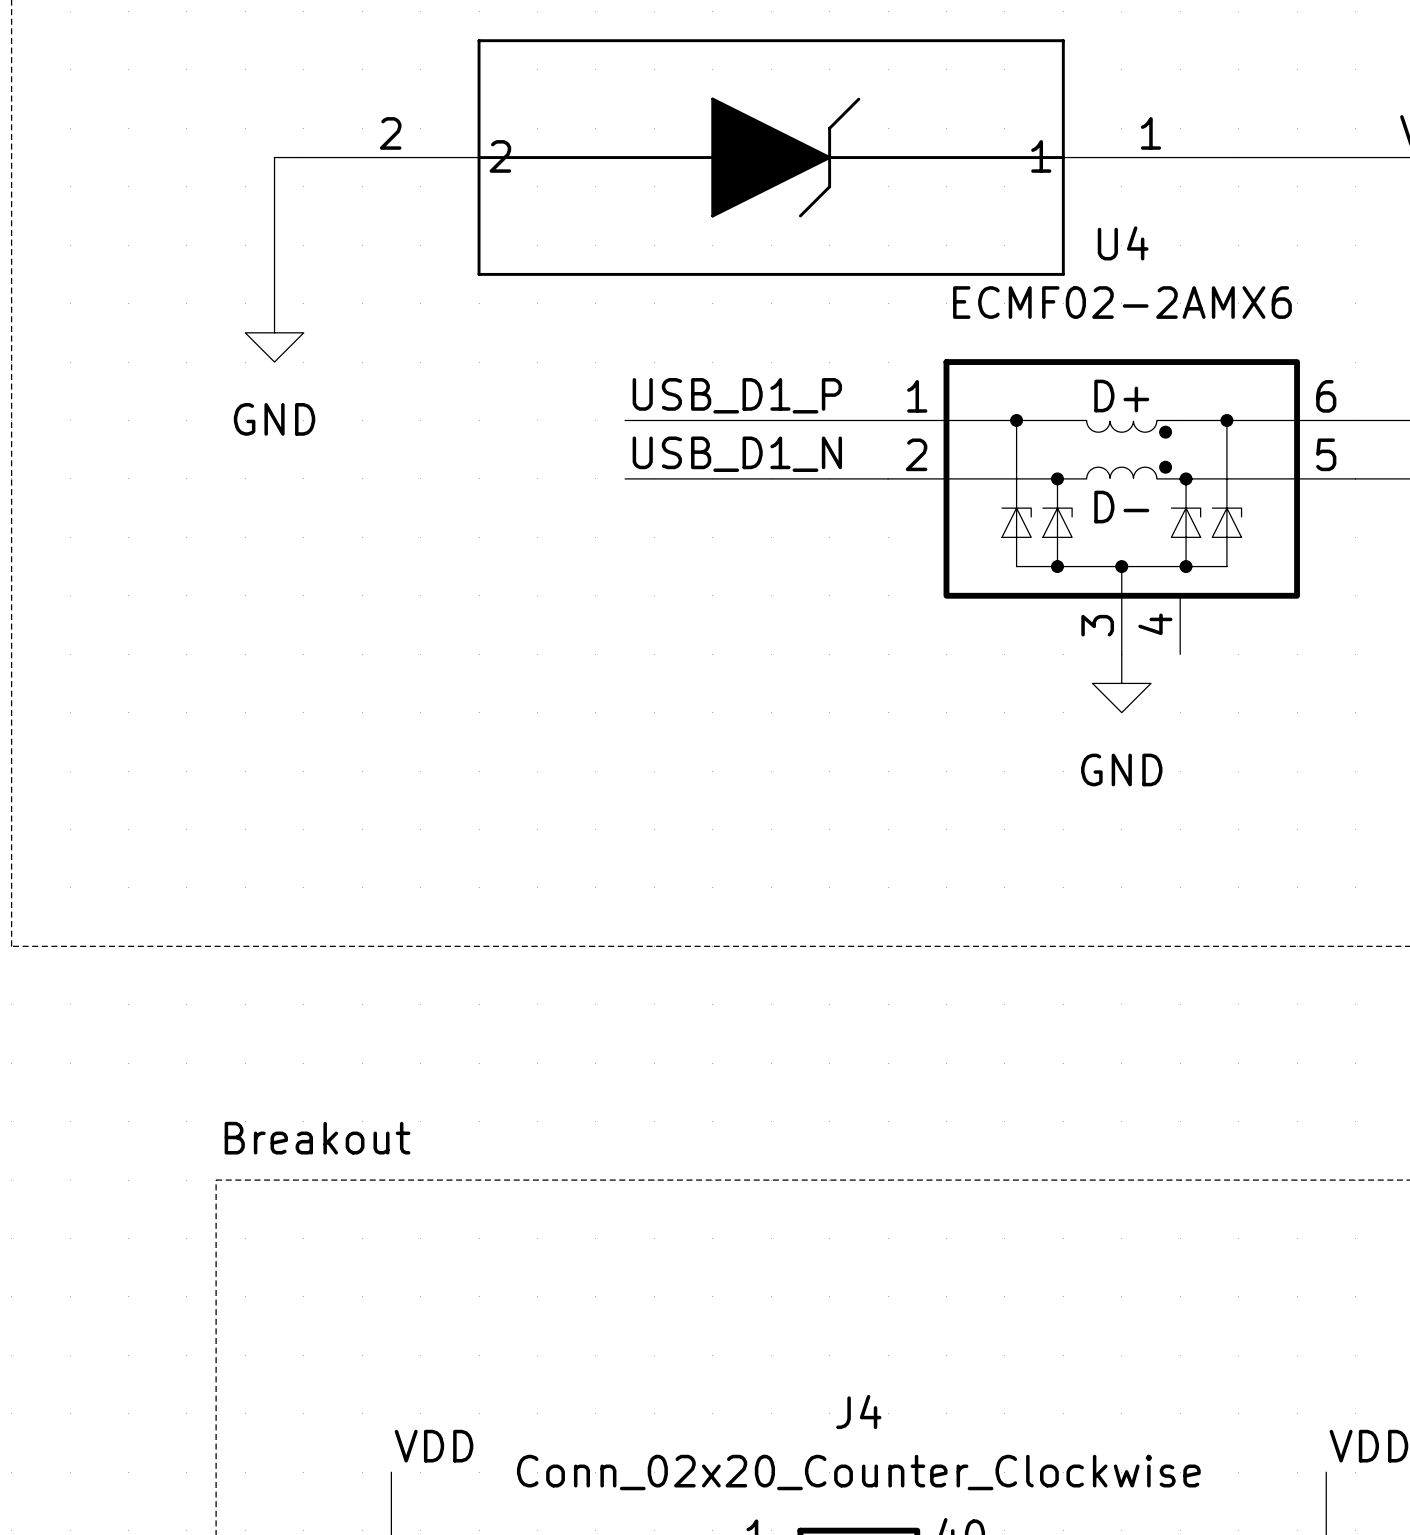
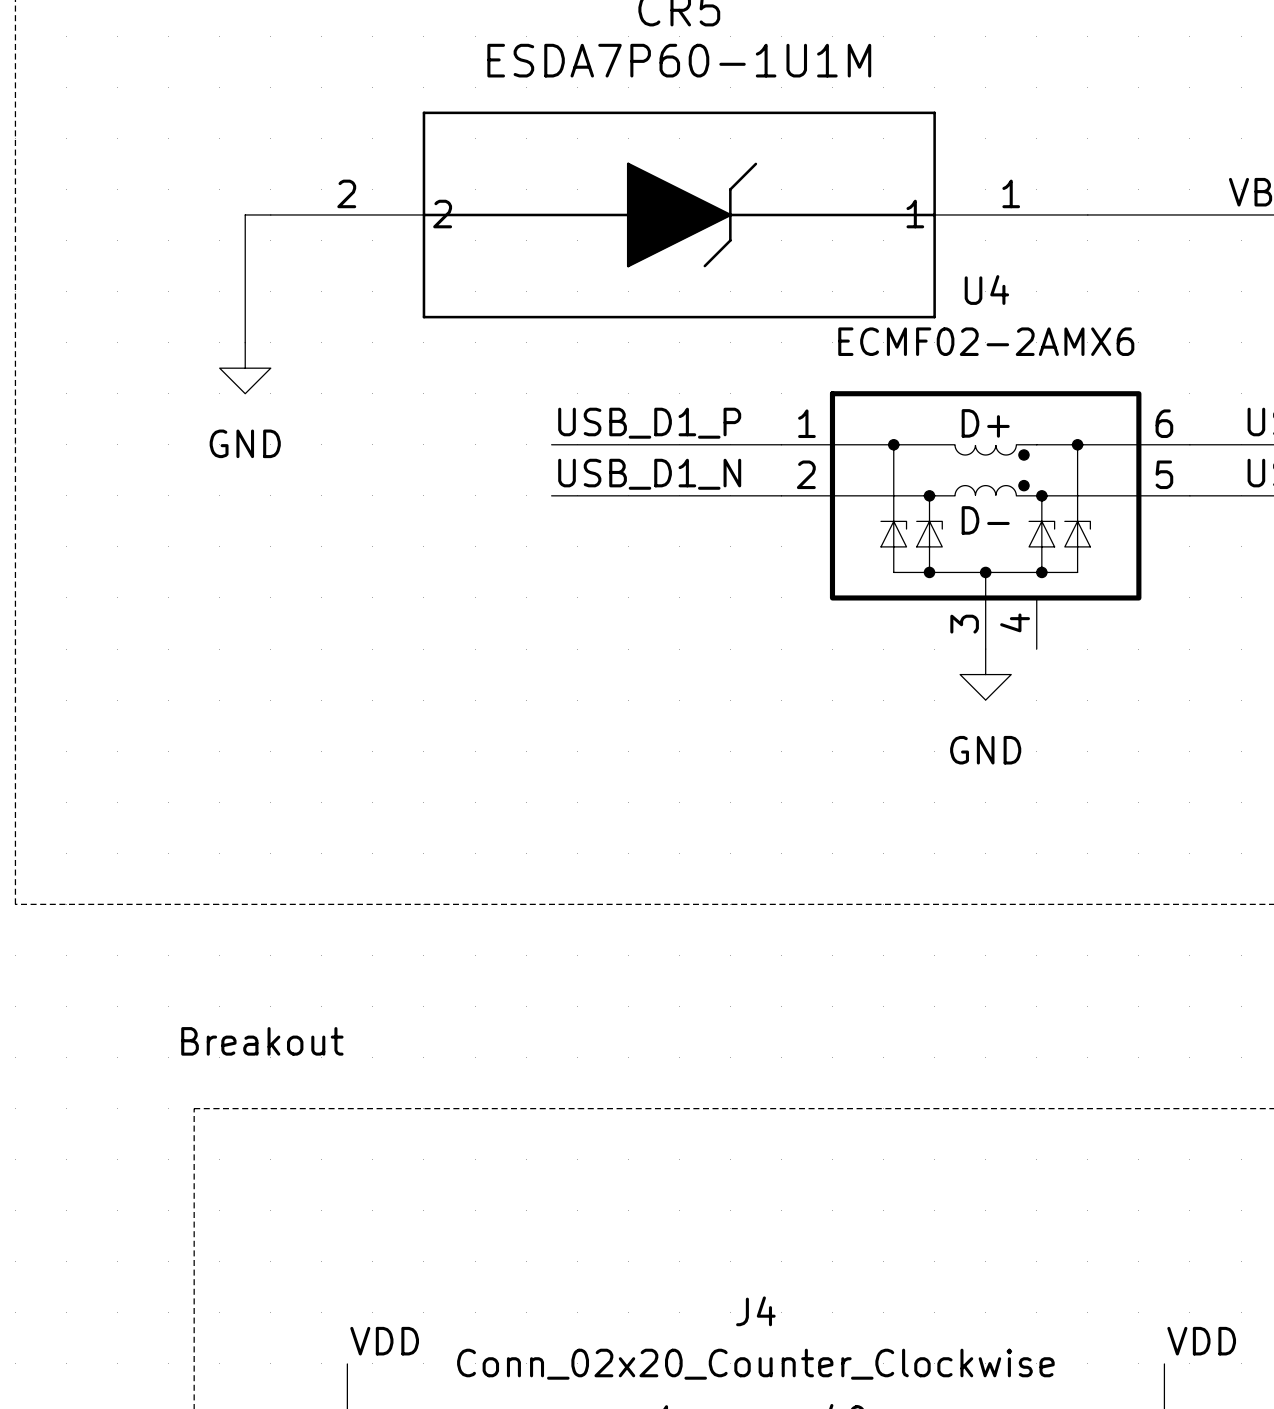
text position: Breakout (317, 1138) -> Breakout (262, 1041)

